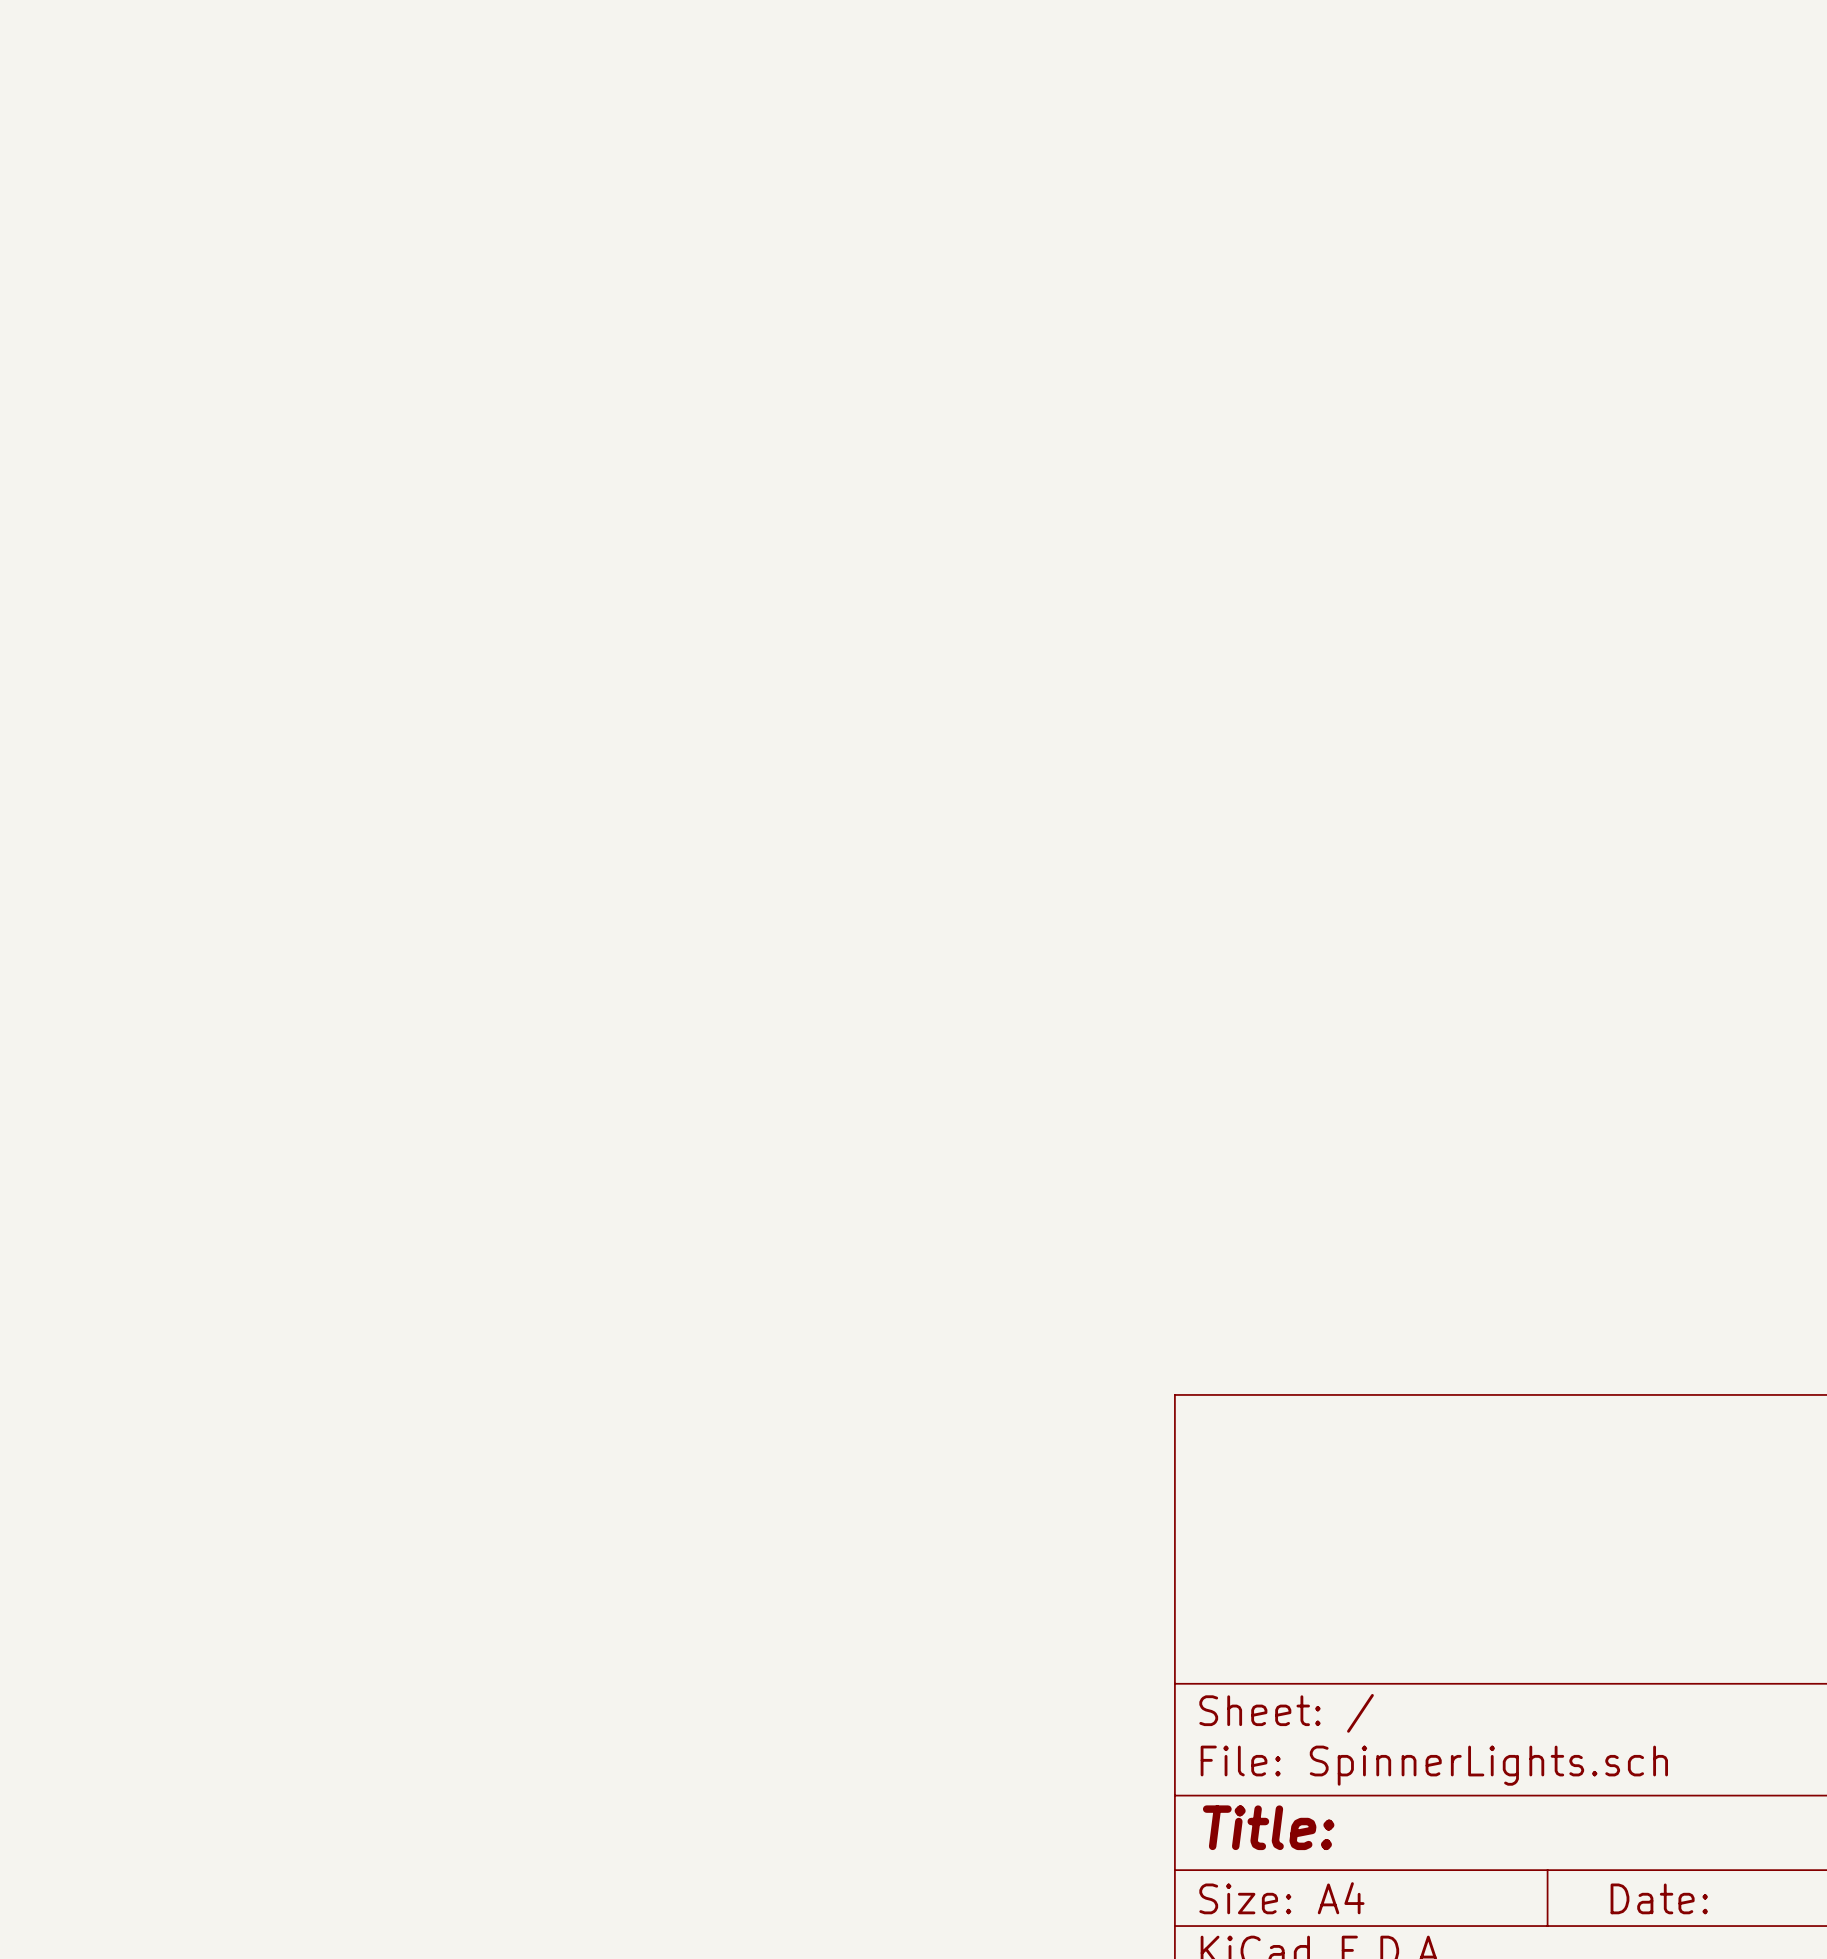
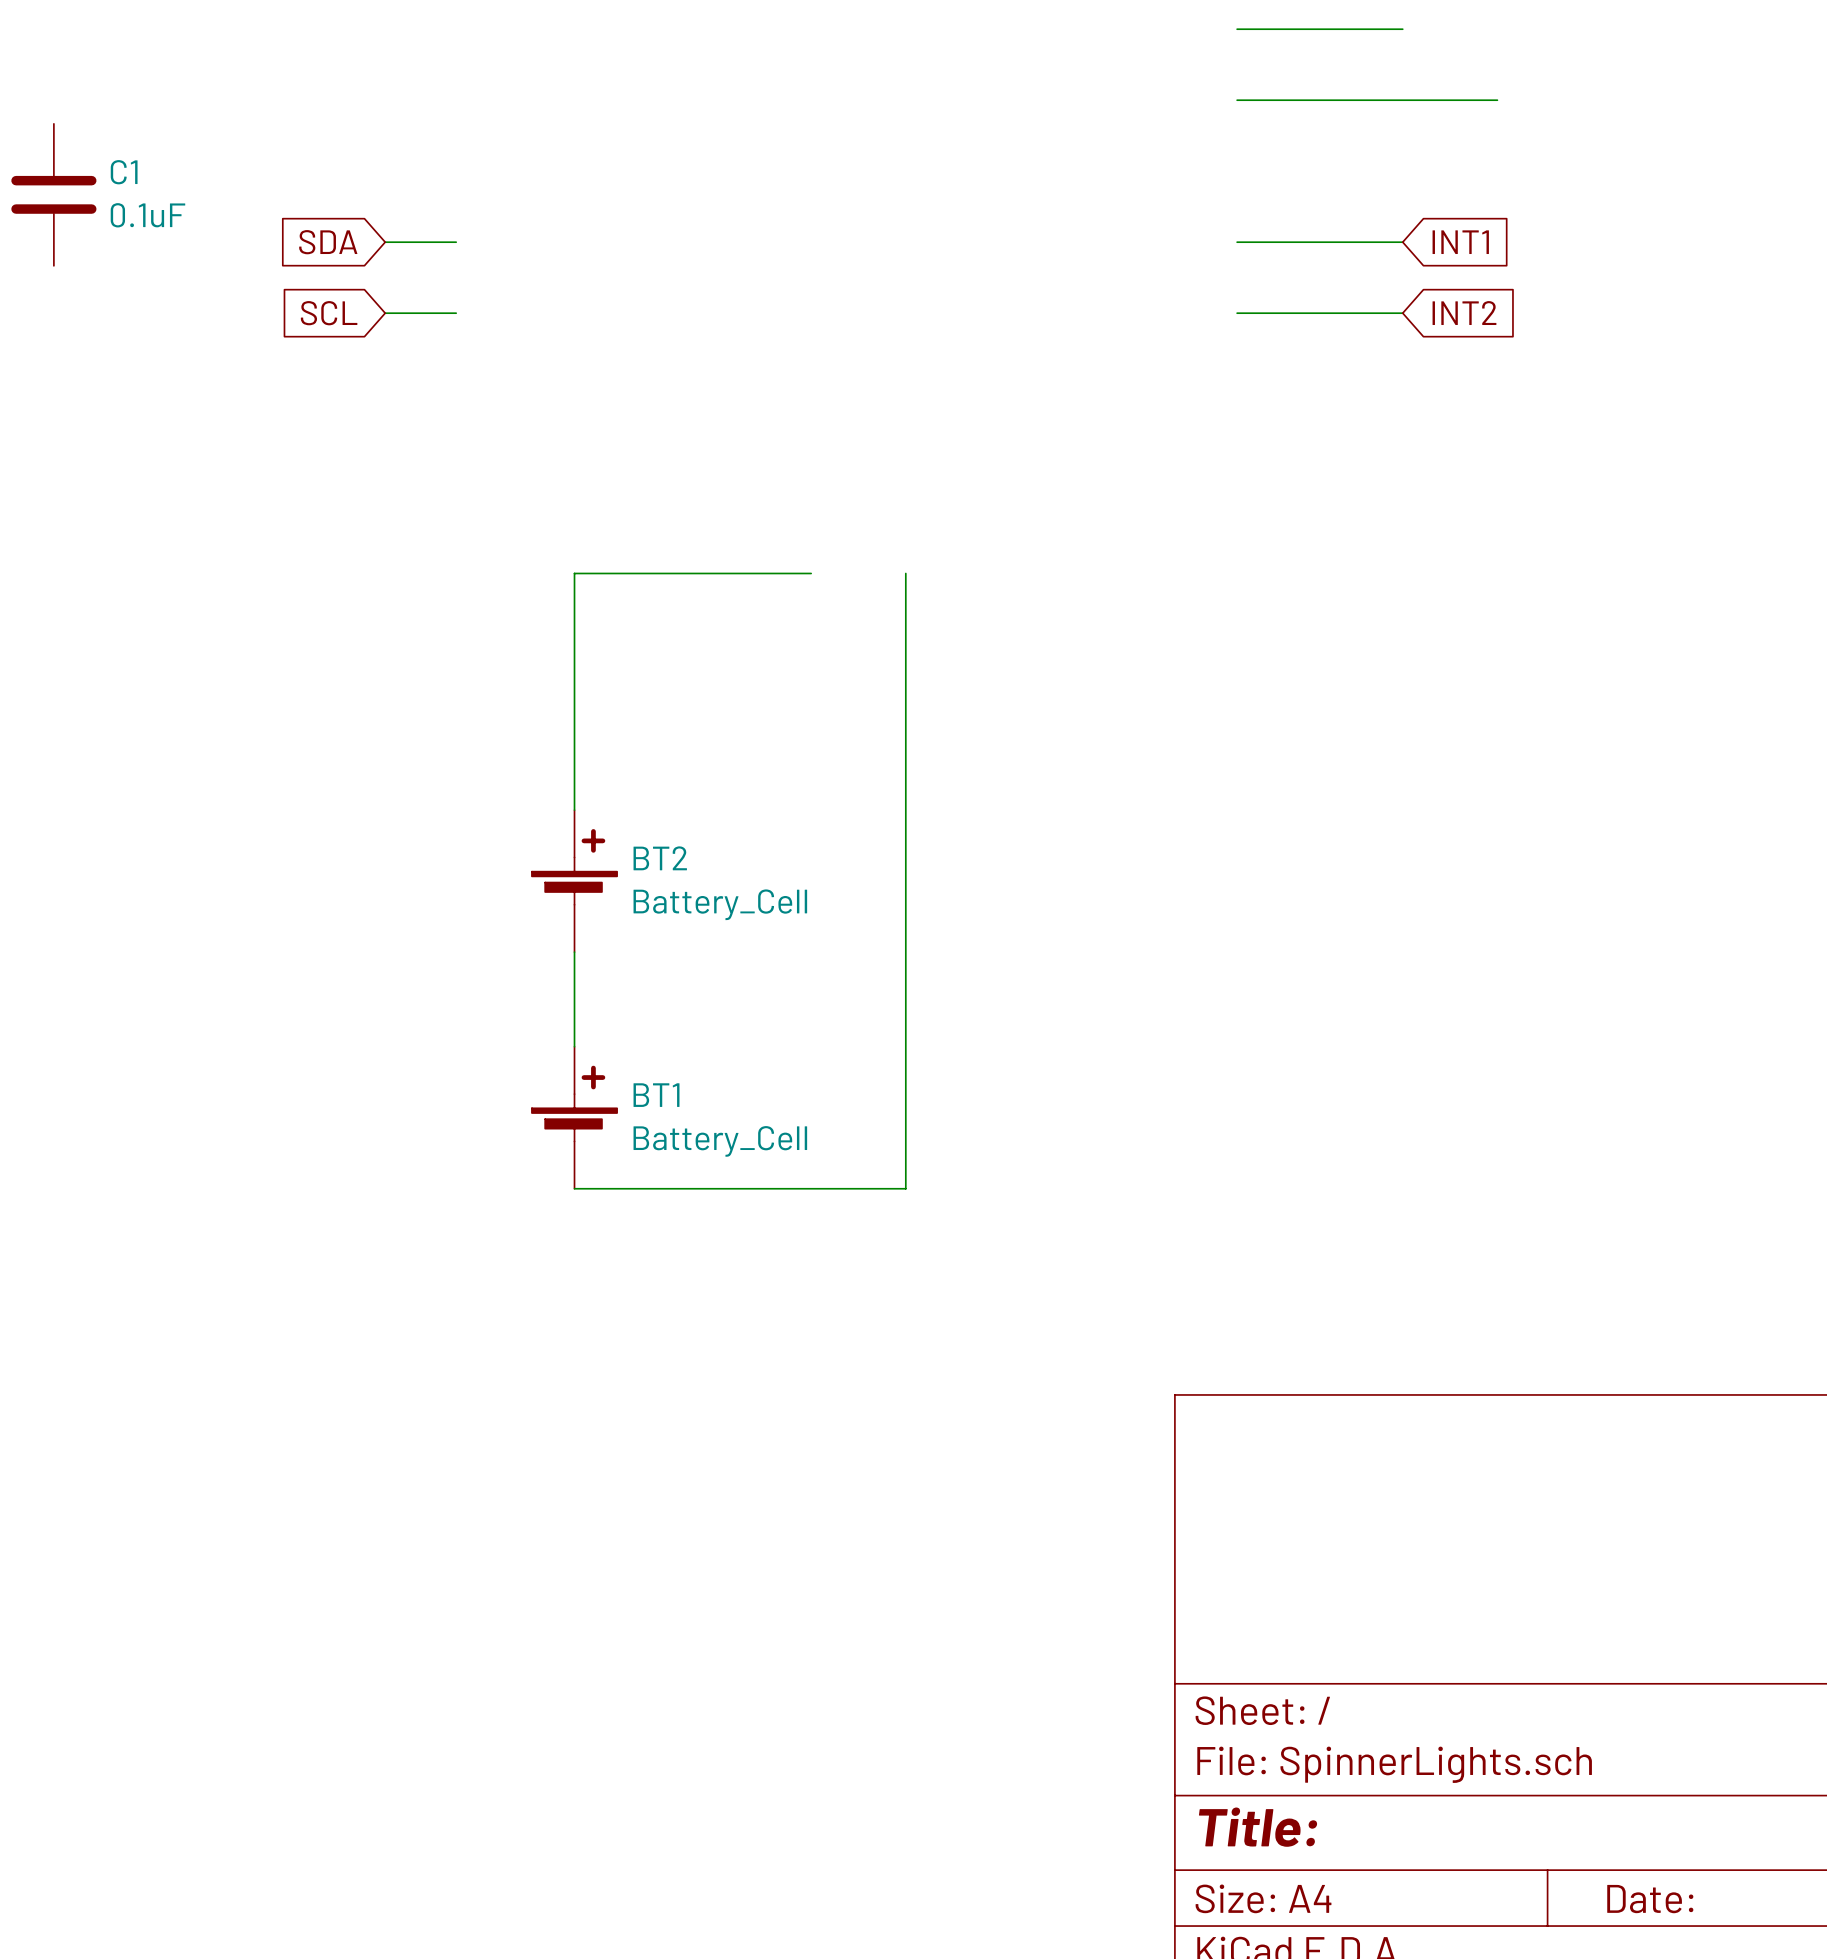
wire: none -> (1237, 29) (1402, 29)
wire: none -> (1237, 100) (1497, 100)
C1: none -> 0.1uF (53, 194)
global label: none -> SDA (328, 242)
wire: none -> (385, 242) (456, 242)
wire: none -> (1237, 242) (1402, 242)
global label: none -> INT1 (1460, 242)
global label: none -> SCL (329, 313)
wire: none -> (385, 313) (456, 313)
wire: none -> (1237, 313) (1402, 313)
global label: none -> INT2 (1464, 313)
wire: none -> (811, 573) (574, 573) (574, 810)
wire: none -> (905, 573) (905, 1188) (574, 1188)
BT2: none -> Battery_Cell (574, 881)
wire: none -> (574, 952) (574, 1046)
BT1: none -> Battery_Cell (574, 1117)

